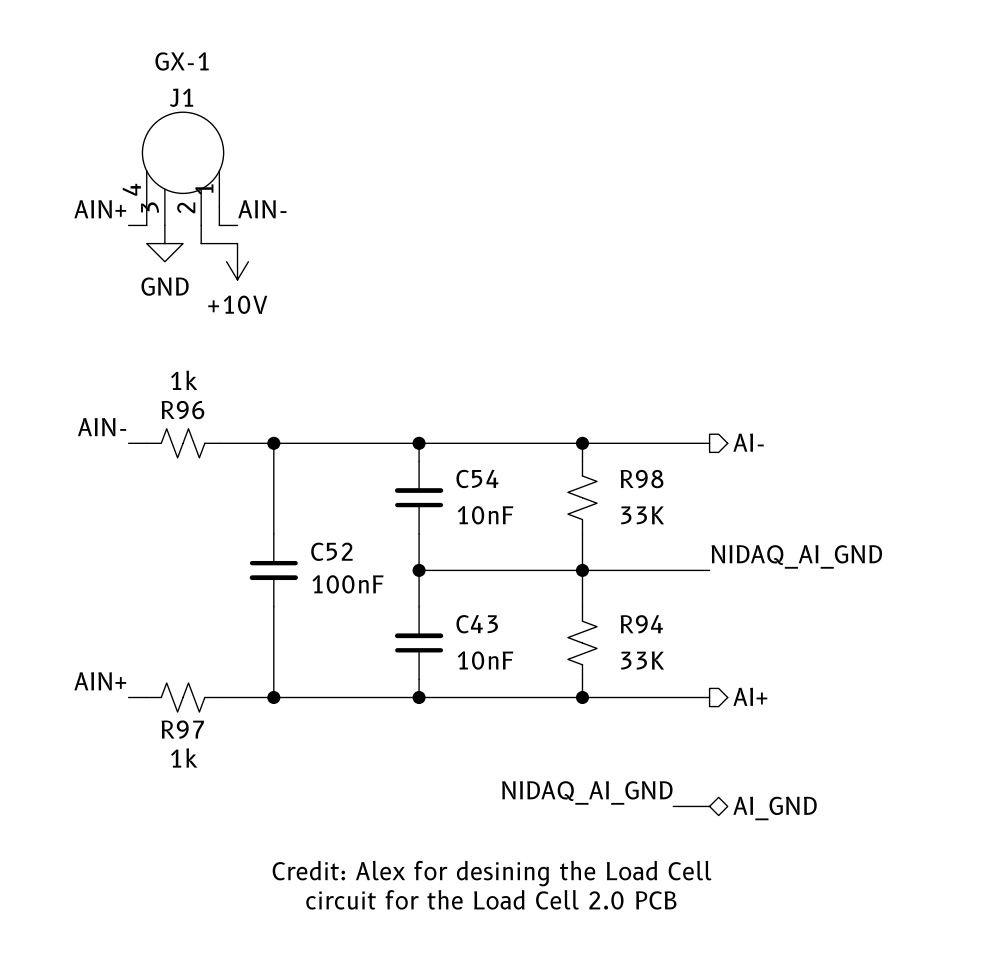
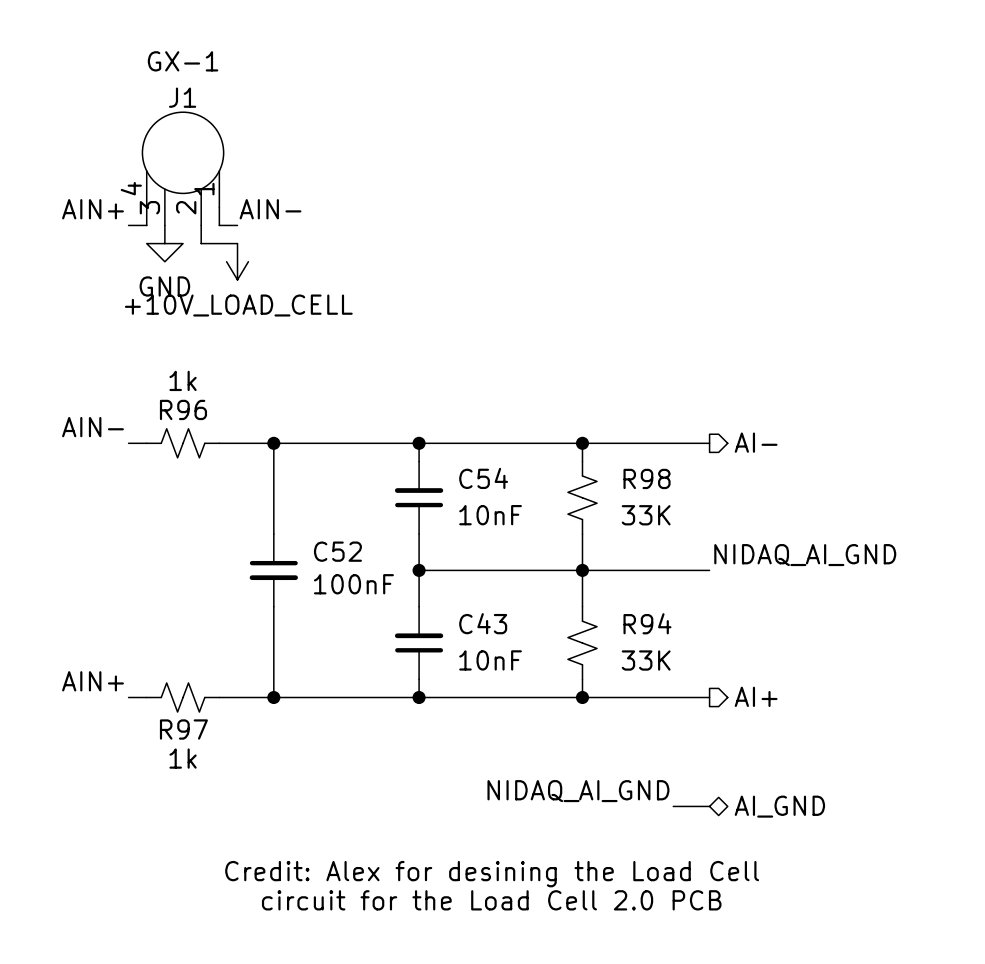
power symbol: +10V (237, 261) -> +10V_LOAD_CELL (237, 261)

